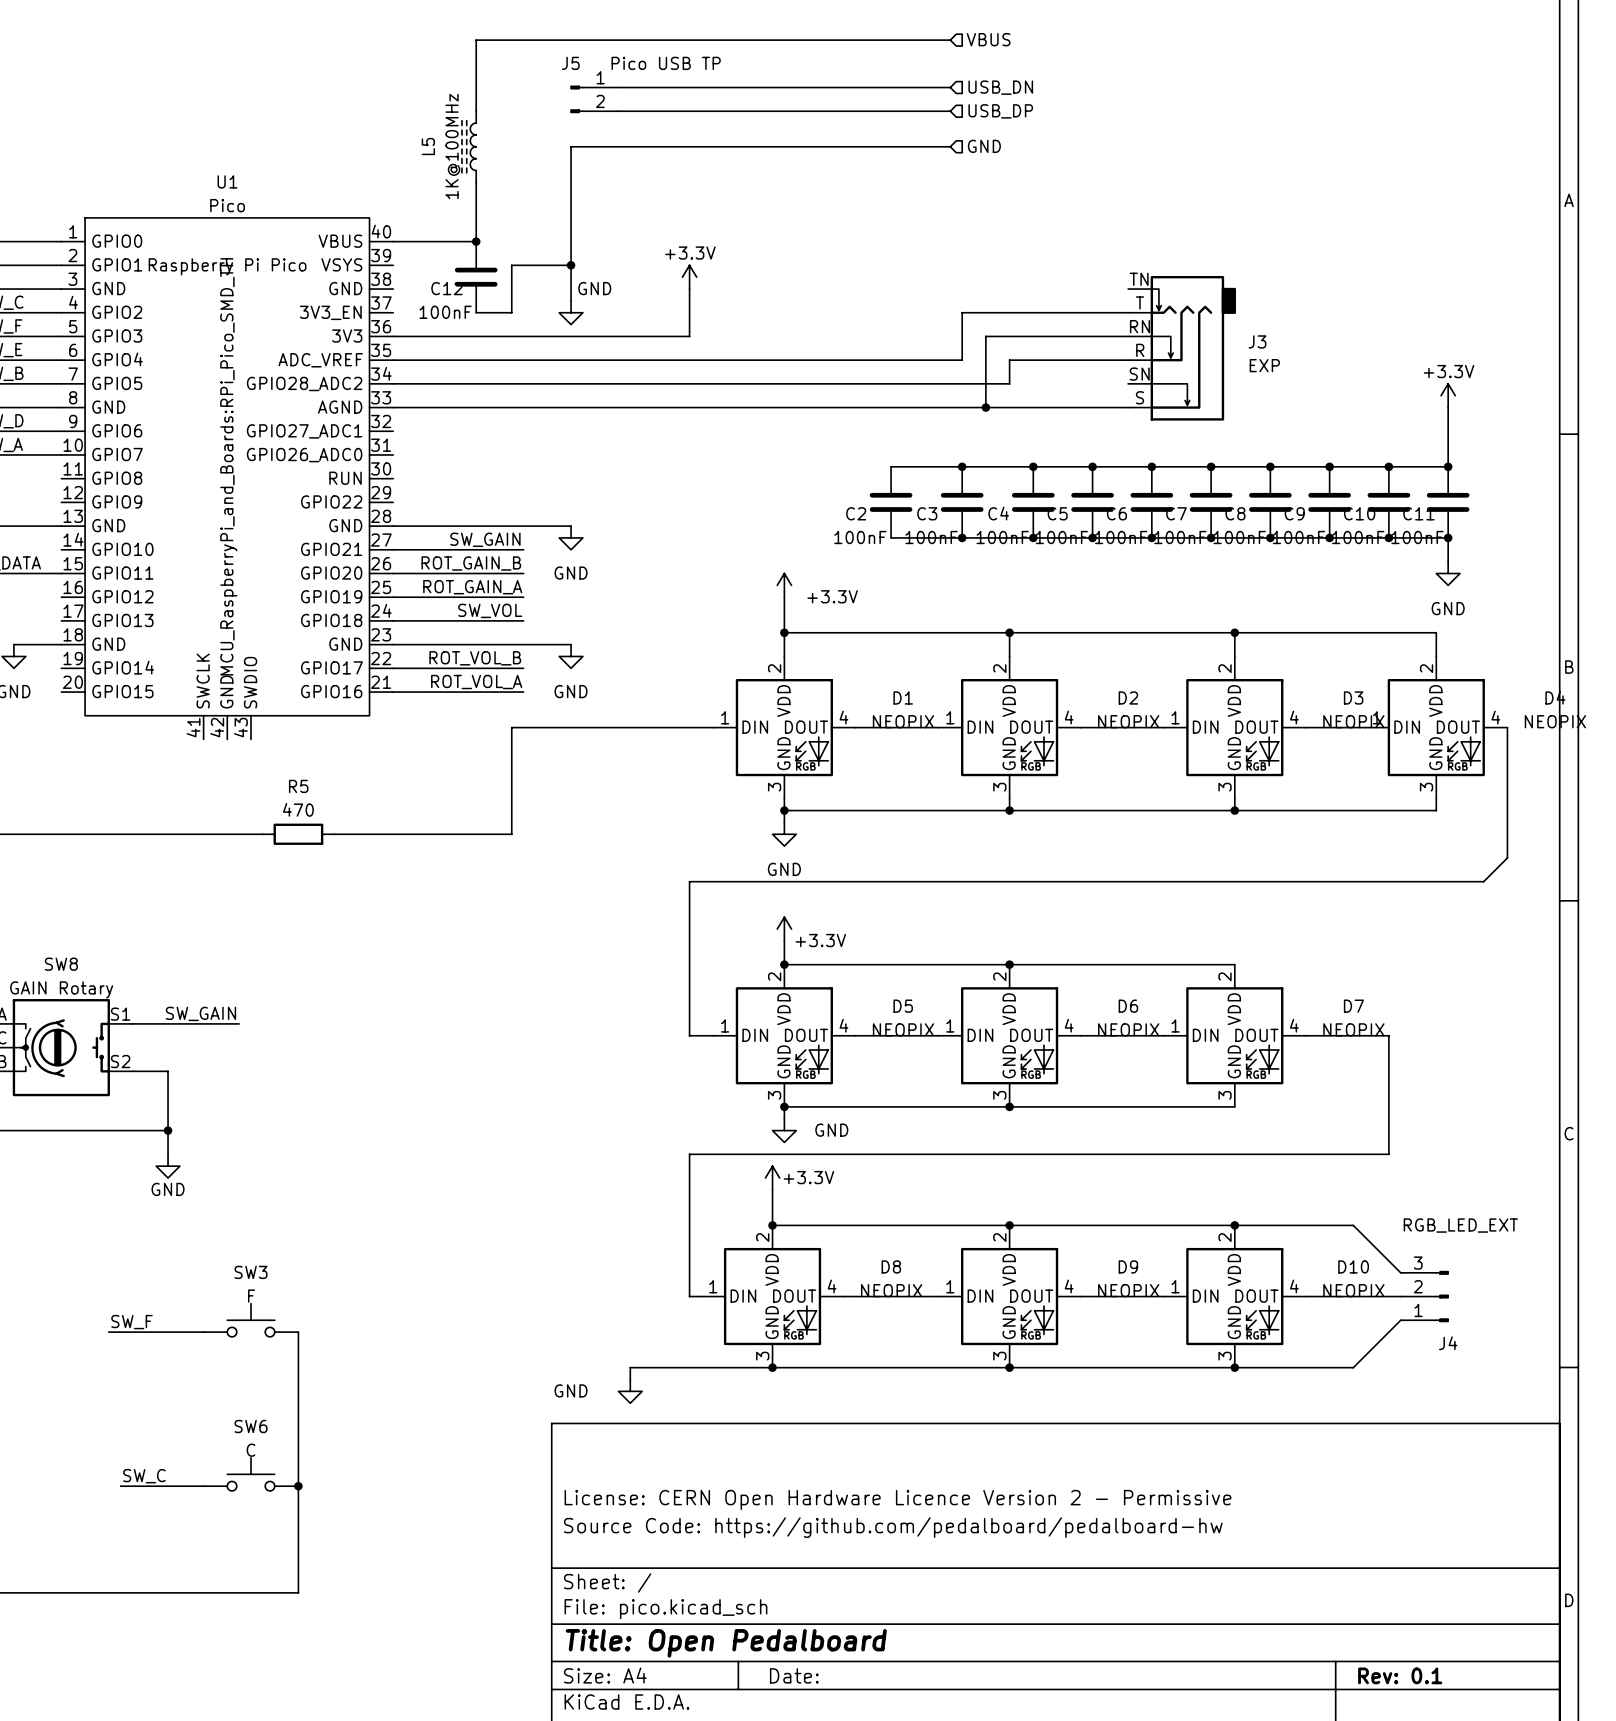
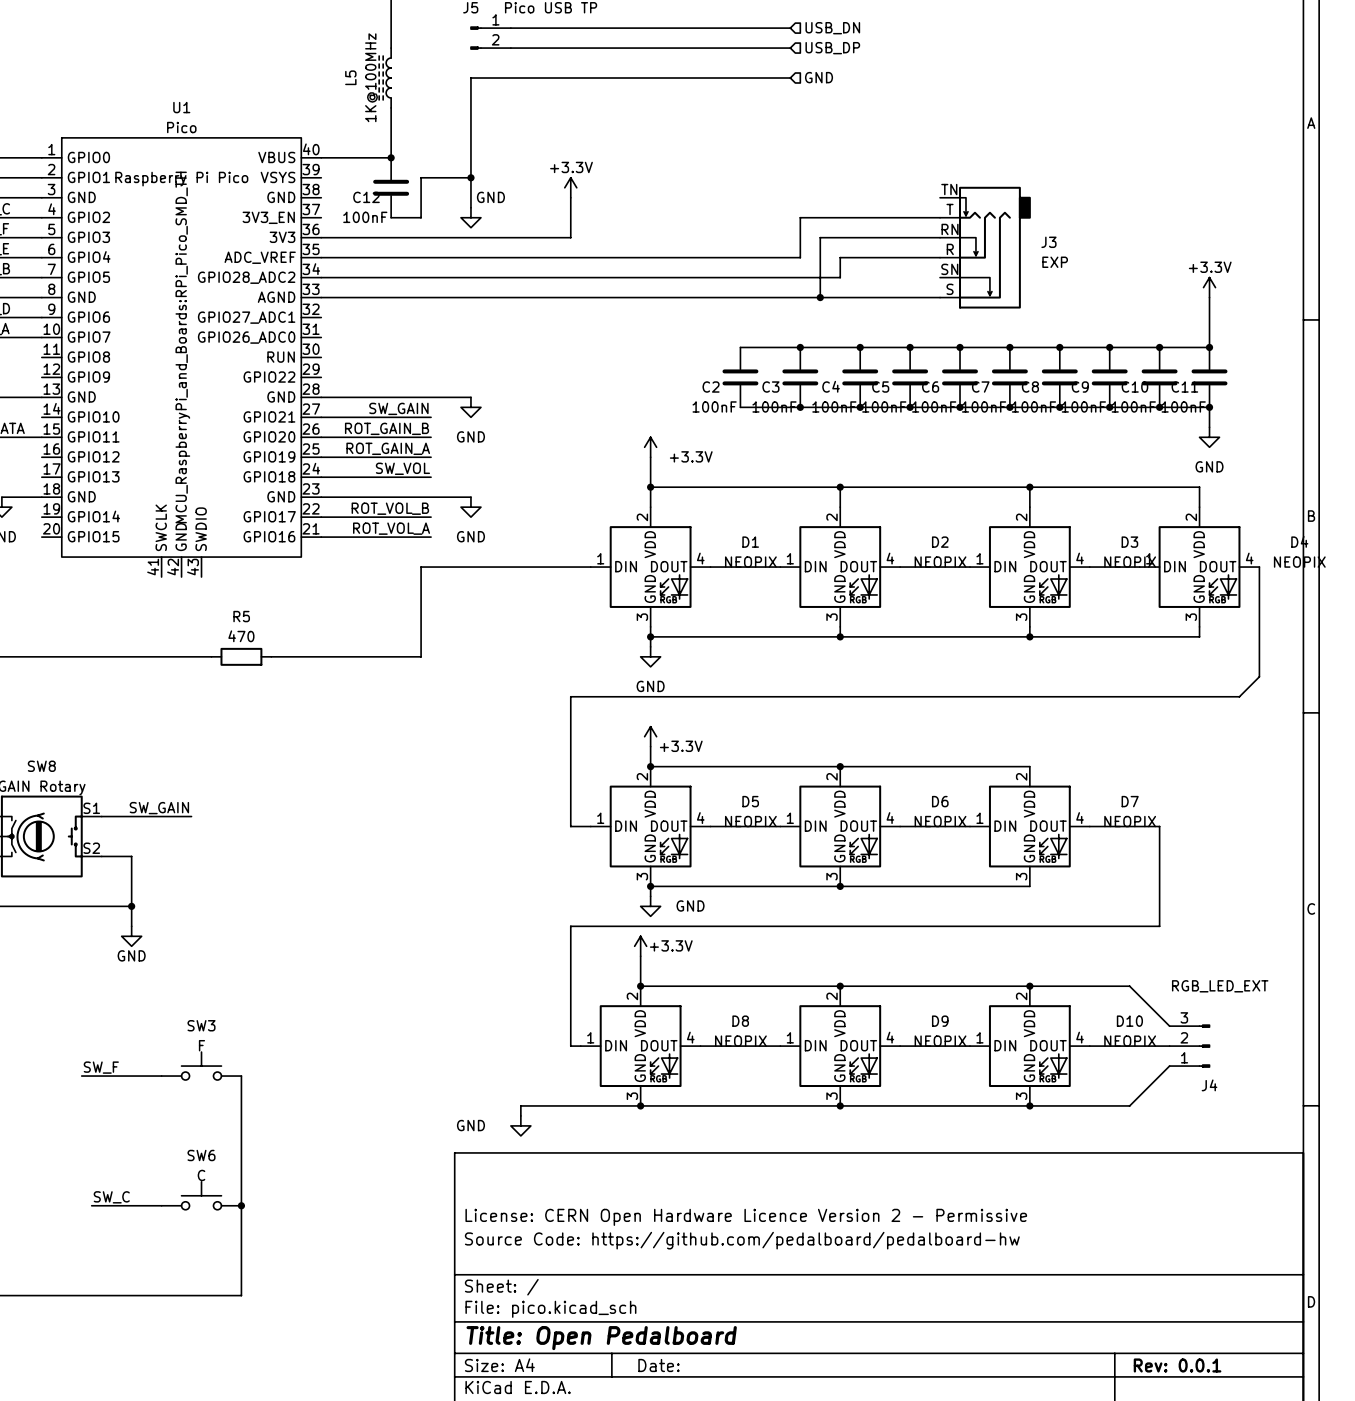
title block: Rev: 0.1 (1400, 1675) -> Rev: 0.0.1 (1177, 1365)

